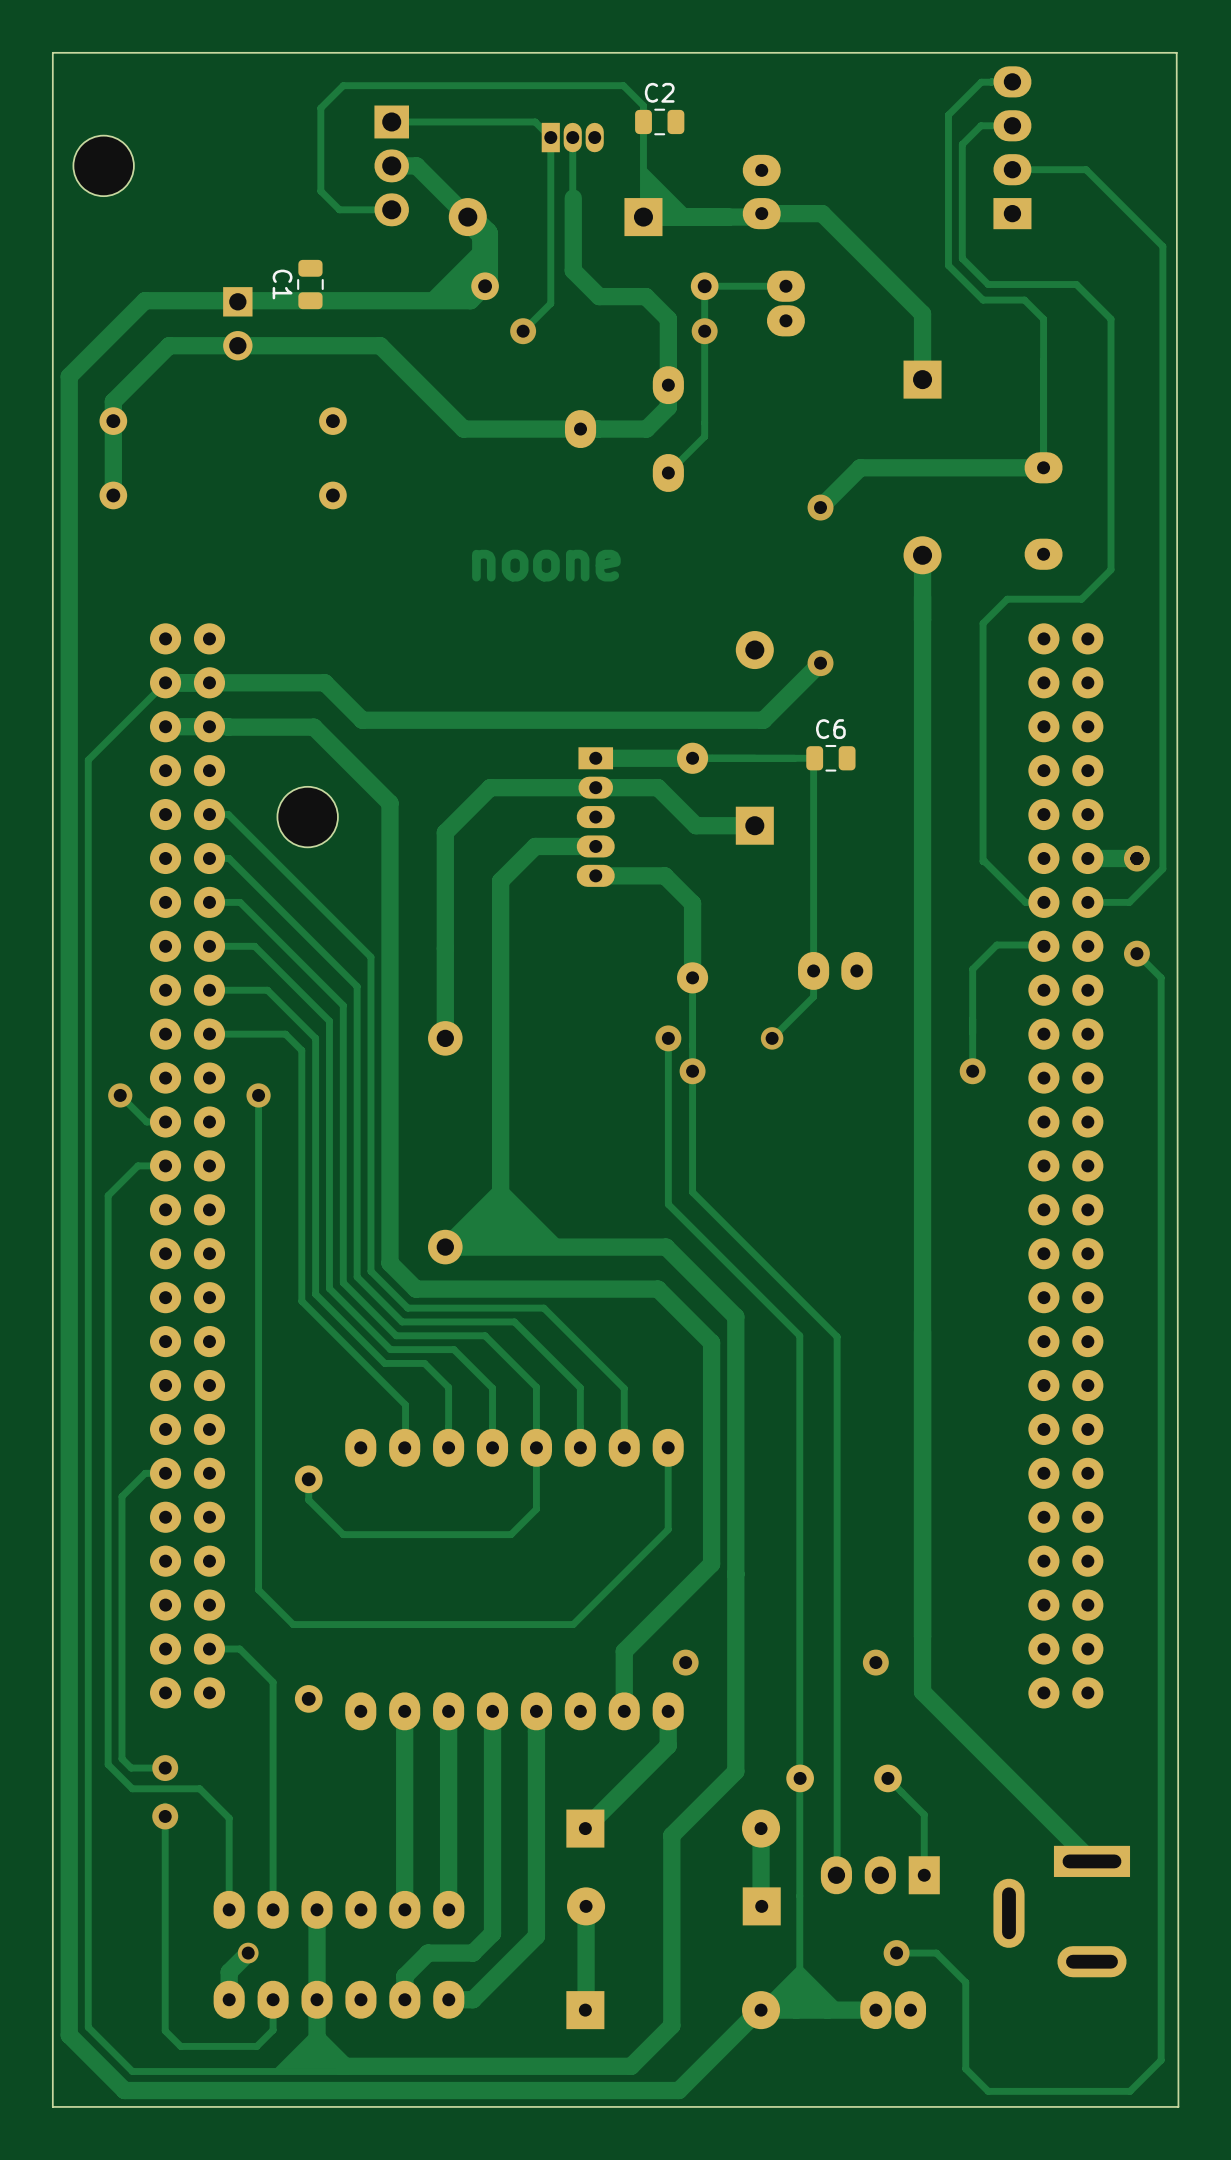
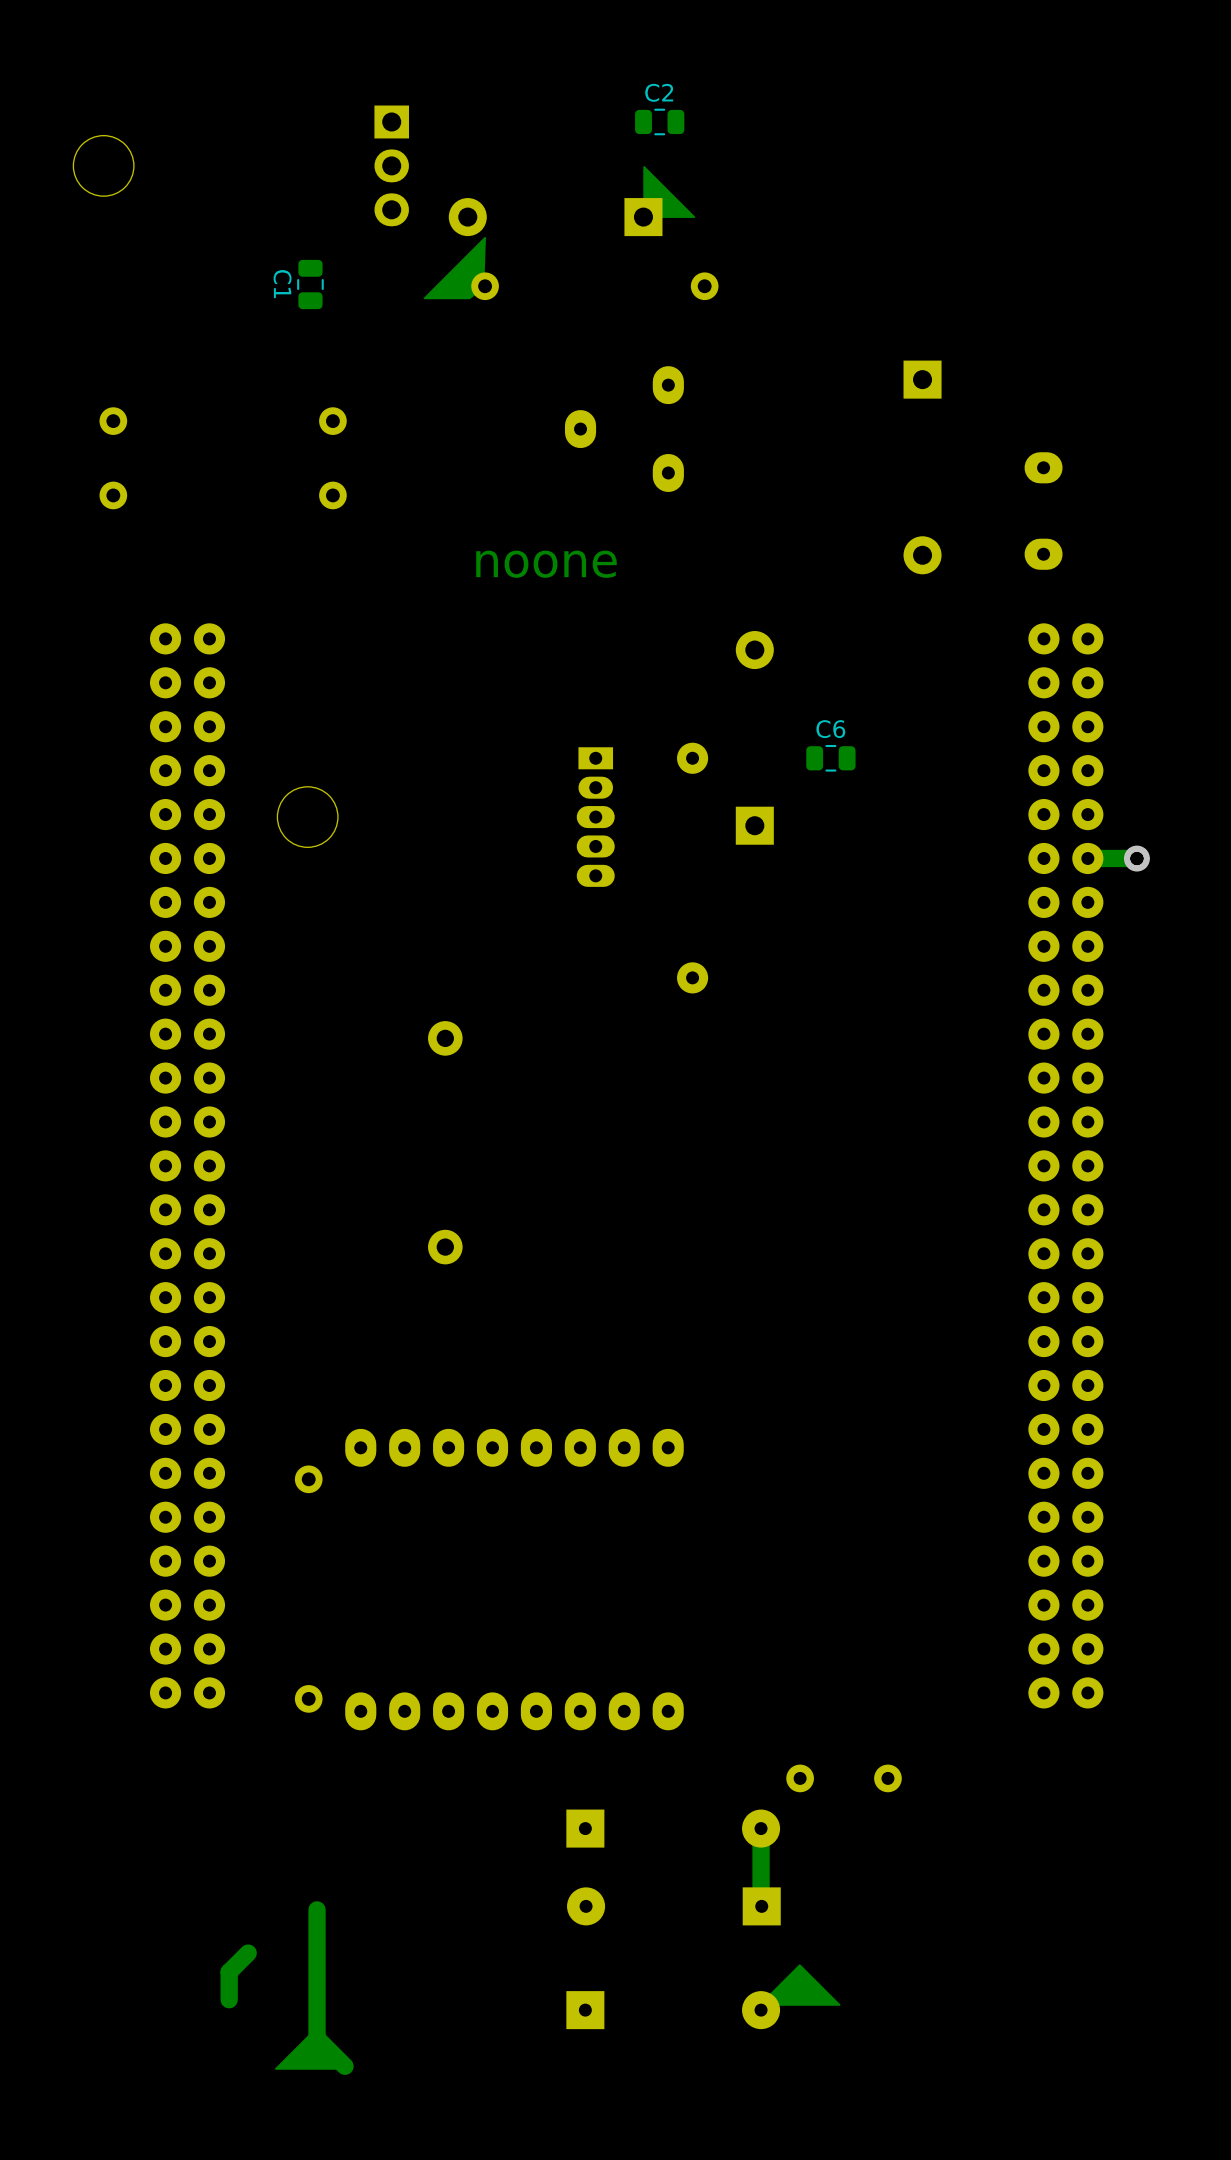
board edge: (1176, 52) (52, 52) (52, 2106) (1178, 2106) (1176, 52) -> none
track: (1012, 81) (981, 82) (948, 115) (948, 265) (983, 300) (1024, 300) (1043, 319) (1043, 467) (860, 467) (820, 507) -> none
track: (391, 121) (535, 121) (550, 137) (550, 303) (523, 331) -> none
track: (1012, 125) (980, 125) (962, 144) (962, 258) (988, 284) (1076, 284) (1111, 319) (1111, 569) (1081, 599) (1007, 599) (983, 623) (983, 861) (1025, 902) (1043, 902) -> none
track: (572, 137) (573, 270) (599, 296) (645, 296) (668, 319) (668, 407) (646, 429) (463, 429) (380, 345) (169, 345) (113, 401) (113, 495) -> none
part: (572, 137) -> none
part: (1012, 147) -> none
track: (391, 165) (416, 165) (485, 234) (485, 286) (470, 300) (144, 300) (69, 376) (69, 2035) (124, 2090) (678, 2090) (759, 2010) -> none
track: (1012, 169) (1086, 169) (1162, 246) (1162, 868) (1129, 902) (1087, 902) -> none
part: (761, 192) -> none
track: (391, 209) (339, 209) (320, 191) (320, 108) (343, 85) (623, 85) (643, 105) (643, 217) (761, 217) -> none
track: (761, 213) (822, 213) (922, 313) (922, 379) -> none
track: (785, 286) (704, 286) (704, 436) (668, 472) -> none
part: (785, 303) -> none
part: (237, 323) -> none
via: (523, 331) -> none
via: (704, 331) -> none
via: (820, 507) -> none
track: (922, 555) (922, 1691) (1091, 1861) -> none
track: (820, 663) (763, 720) (362, 720) (324, 682) (165, 682) (88, 760) (88, 2027) (132, 2071) (350, 2071) -> none
via: (820, 663) -> none
track: (165, 726) (313, 727) (389, 803) (389, 1263) (415, 1289) (657, 1289) (711, 1342) (711, 1564) (624, 1651) (624, 1711) -> none
track: (595, 758) (814, 758) (813, 996) (772, 1038) -> none
track: (209, 814) (228, 814) (370, 957) (370, 1271) (407, 1308) (543, 1308) (624, 1388) (624, 1447) -> none
track: (754, 825) (696, 825) (657, 787) (490, 787) (445, 832) (445, 1038) -> none
track: (595, 846) (535, 846) (500, 881) (500, 1192) (445, 1247) -> none
track: (209, 858) (229, 858) (357, 986) (357, 1277) (402, 1321) (514, 1321) (580, 1387) (580, 1447) -> none
track: (595, 875) (664, 875) (692, 903) (692, 1192) (837, 1336) (837, 1880) -> none
track: (209, 902) (240, 902) (343, 1005) (343, 1282) (396, 1335) (485, 1335) (536, 1387) (536, 1509) (511, 1534) (343, 1534) (308, 1500) (308, 1479) -> none
track: (209, 946) (254, 946) (329, 1021) (329, 1288) (390, 1349) (453, 1349) (492, 1388) (492, 1447) -> none
track: (1043, 946) (996, 945) (972, 969) (972, 1071) -> none
track: (1136, 953) (1161, 977) (1161, 2060) (1130, 2091) (988, 2091) (965, 2068) (965, 1982) (936, 1953) (896, 1953) -> none
via: (1136, 953) -> none
part: (835, 970) -> none
track: (209, 990) (267, 990) (315, 1038) (315, 1294) (384, 1363) (424, 1363) (448, 1387) (448, 1447) -> none
track: (209, 1034) (285, 1034) (301, 1050) (301, 1301) (405, 1404) (404, 1447) -> none
track: (668, 1038) (668, 1204) (799, 1335) (799, 1969) (759, 2010) -> none
via: (668, 1038) -> none
via: (772, 1038) -> none
via: (692, 1071) -> none
via: (972, 1071) -> none
track: (258, 1092) (258, 1589) (293, 1624) (573, 1624) (668, 1529) (668, 1447) -> none
track: (120, 1095) (146, 1121) (165, 1121) -> none
via: (120, 1095) -> none
via: (258, 1095) -> none
track: (165, 1165) (137, 1165) (108, 1195) (108, 1764) (132, 1788) (199, 1788) (229, 1818) (229, 1909) -> none
drawing: [447, 1184, 561, 1242] -> none
track: (445, 1247) (666, 1247) (735, 1316) (735, 1771) (671, 1835) (671, 2025) (631, 2066) (345, 2066) (339, 2071) -> none
track: (165, 1473) (145, 1473) (121, 1496) (121, 1758) (131, 1768) (165, 1768) -> none
track: (209, 1649) (239, 1649) (273, 1682) (273, 1909) -> none
via: (685, 1662) -> none
via: (875, 1662) -> none
track: (404, 1711) (404, 1909) -> none
track: (448, 1711) (448, 1909) -> none
track: (492, 1711) (492, 1933) (472, 1953) (428, 1953) (404, 1976) (404, 1999) -> none
track: (536, 1711) (536, 1936) (472, 1999) (448, 1999) -> none
track: (668, 1711) (668, 1745) (585, 1828) -> none
via: (165, 1768) -> none
track: (887, 1778) (924, 1814) (924, 1875) -> none
track: (165, 1806) (165, 2030) (180, 2046) (256, 2046) (273, 2030) (273, 1999) -> none
via: (165, 1816) -> none
part: (880, 1875) -> none
track: (586, 1906) (586, 2007) (583, 2010) -> none
part: (338, 1909) -> none
part: (1061, 1911) -> none
via: (248, 1953) -> none
via: (896, 1953) -> none
part: (338, 1999) -> none
track: (875, 2010) (759, 2010) -> none
part: (893, 2010) -> none

